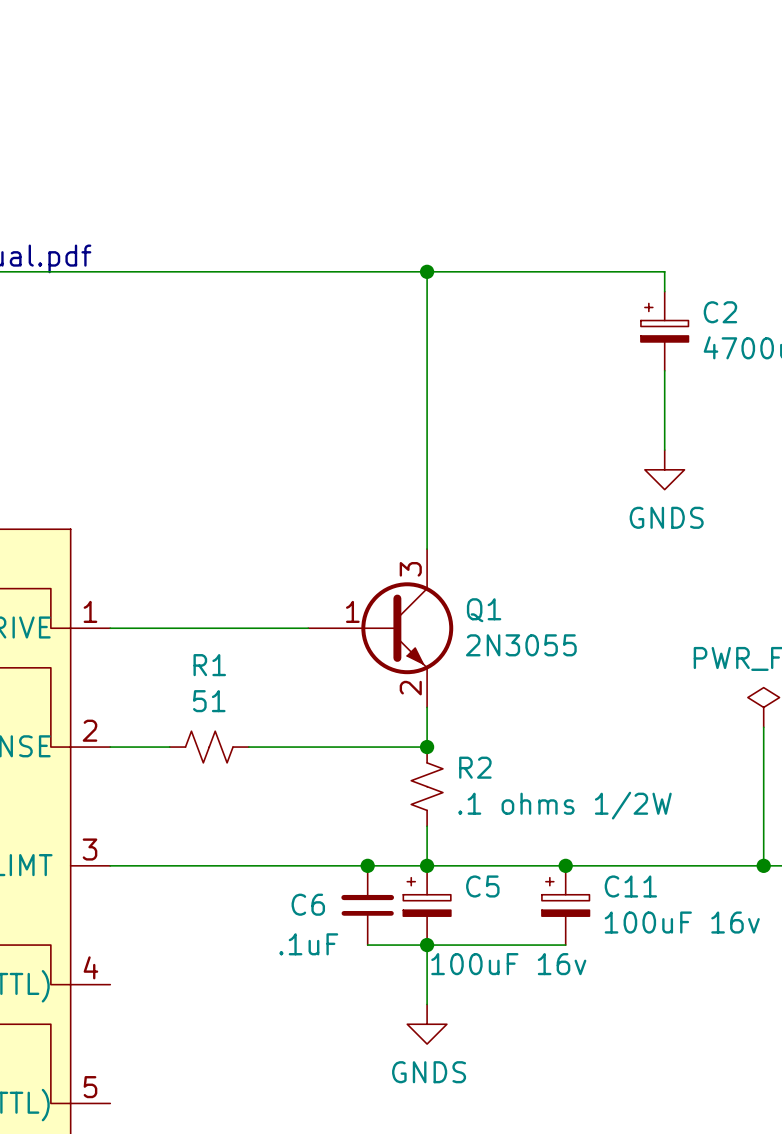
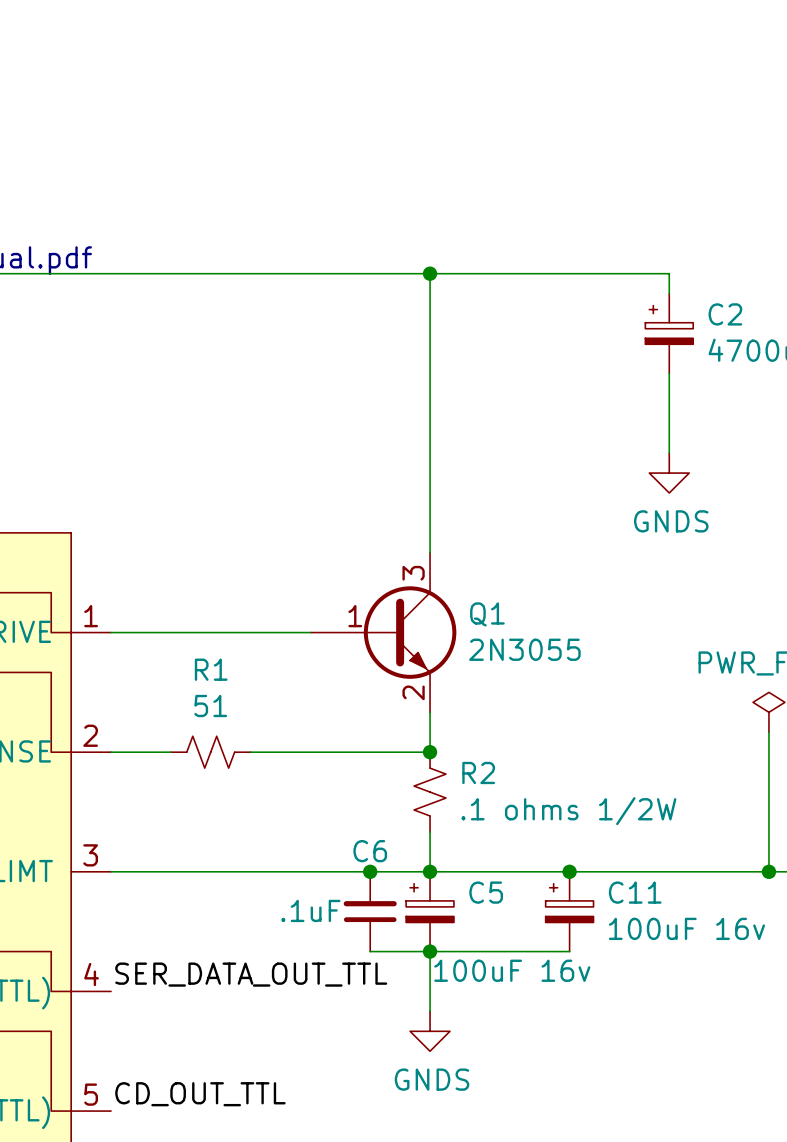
C6 name position: C6 (308, 904) -> C6 (370, 851)
C6 value position: .1uF (308, 944) -> .1uF (310, 910)
label: none -> SER_DATA_OUT_TTL (251, 974)
label: none -> CD_OUT_TTL (200, 1094)

